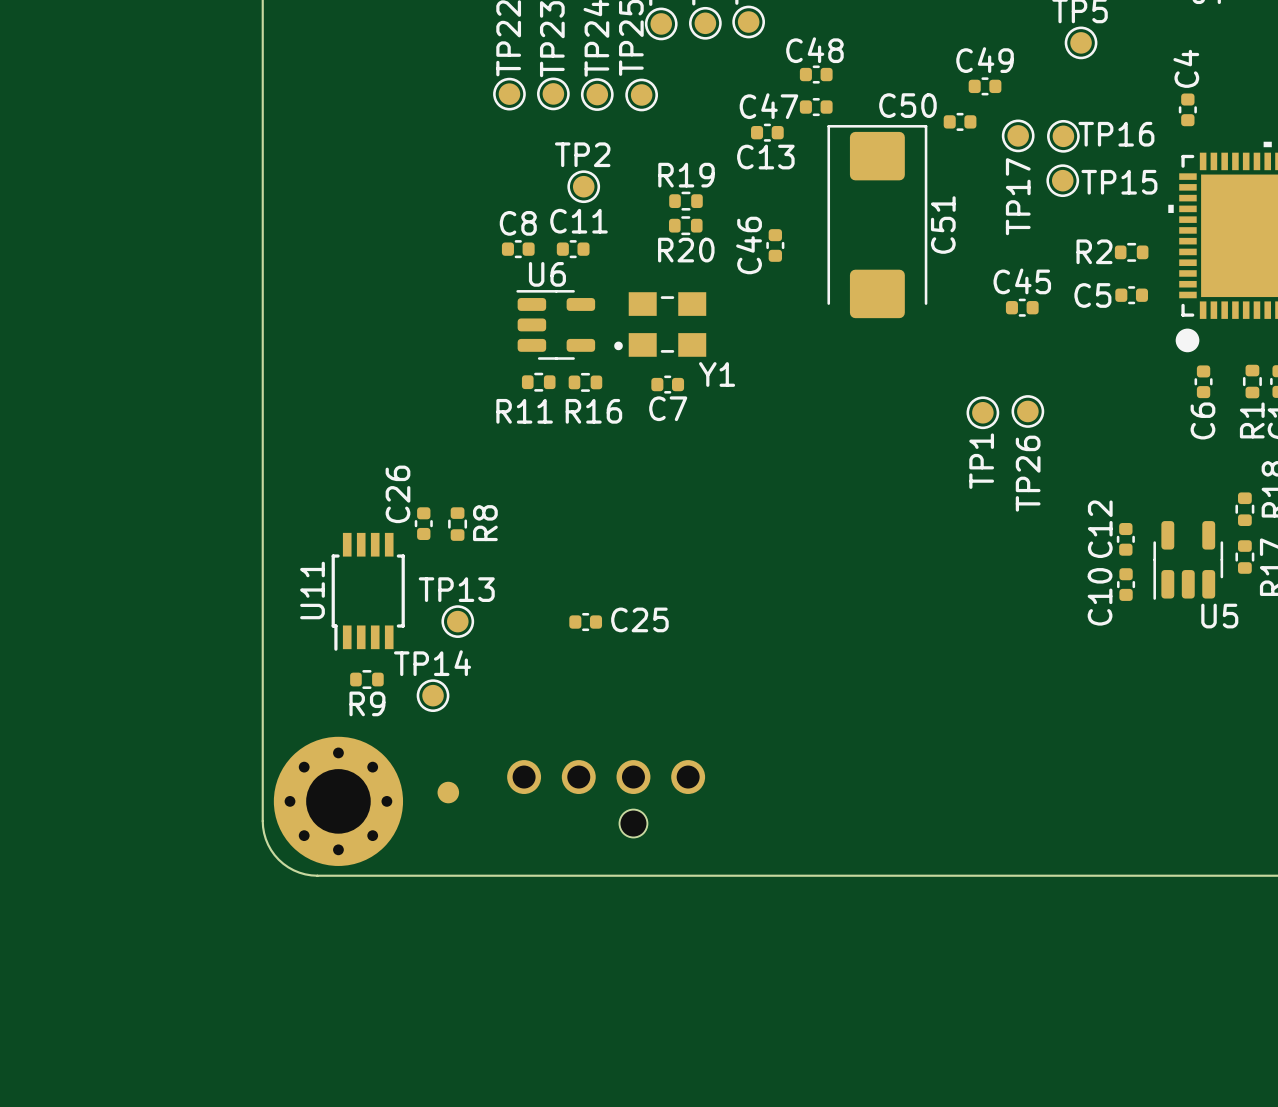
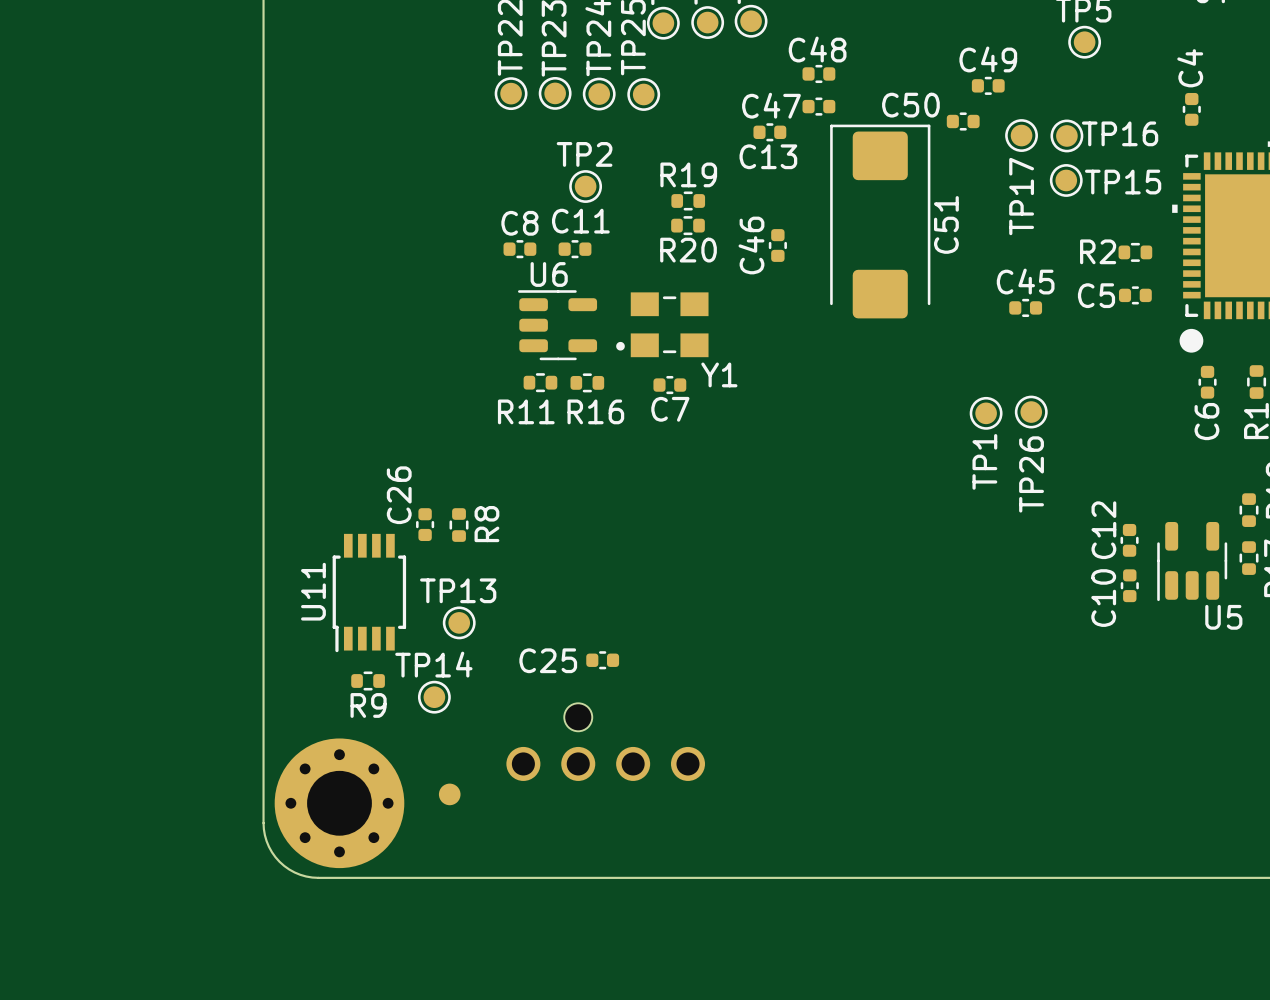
C25 name position: C25 (639, 619) -> C25 (548, 660)
C25 position: (585, 622) -> (602, 660)
part rotation: 0° (606, 798) -> 180° (605, 742)

